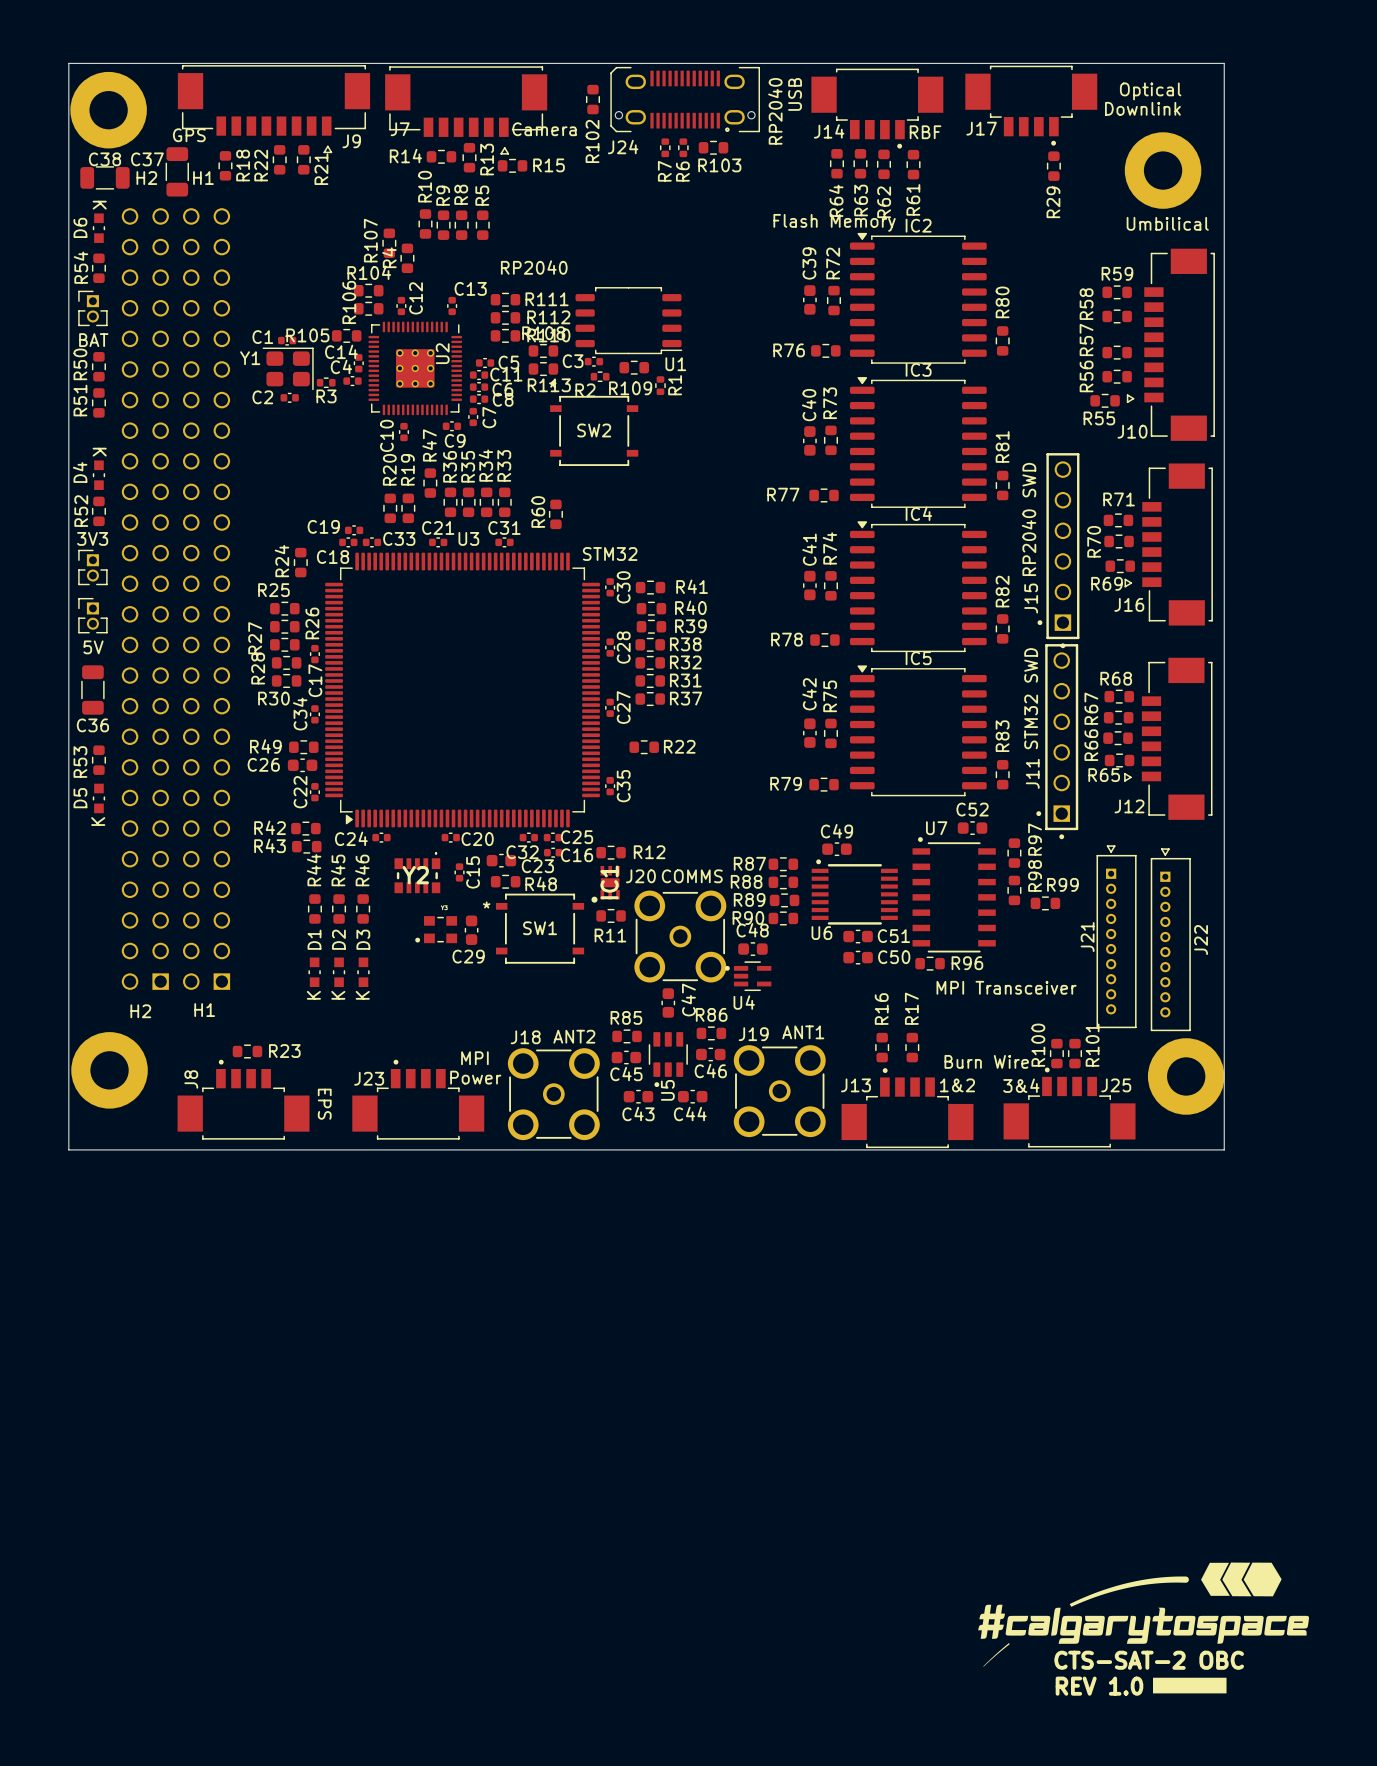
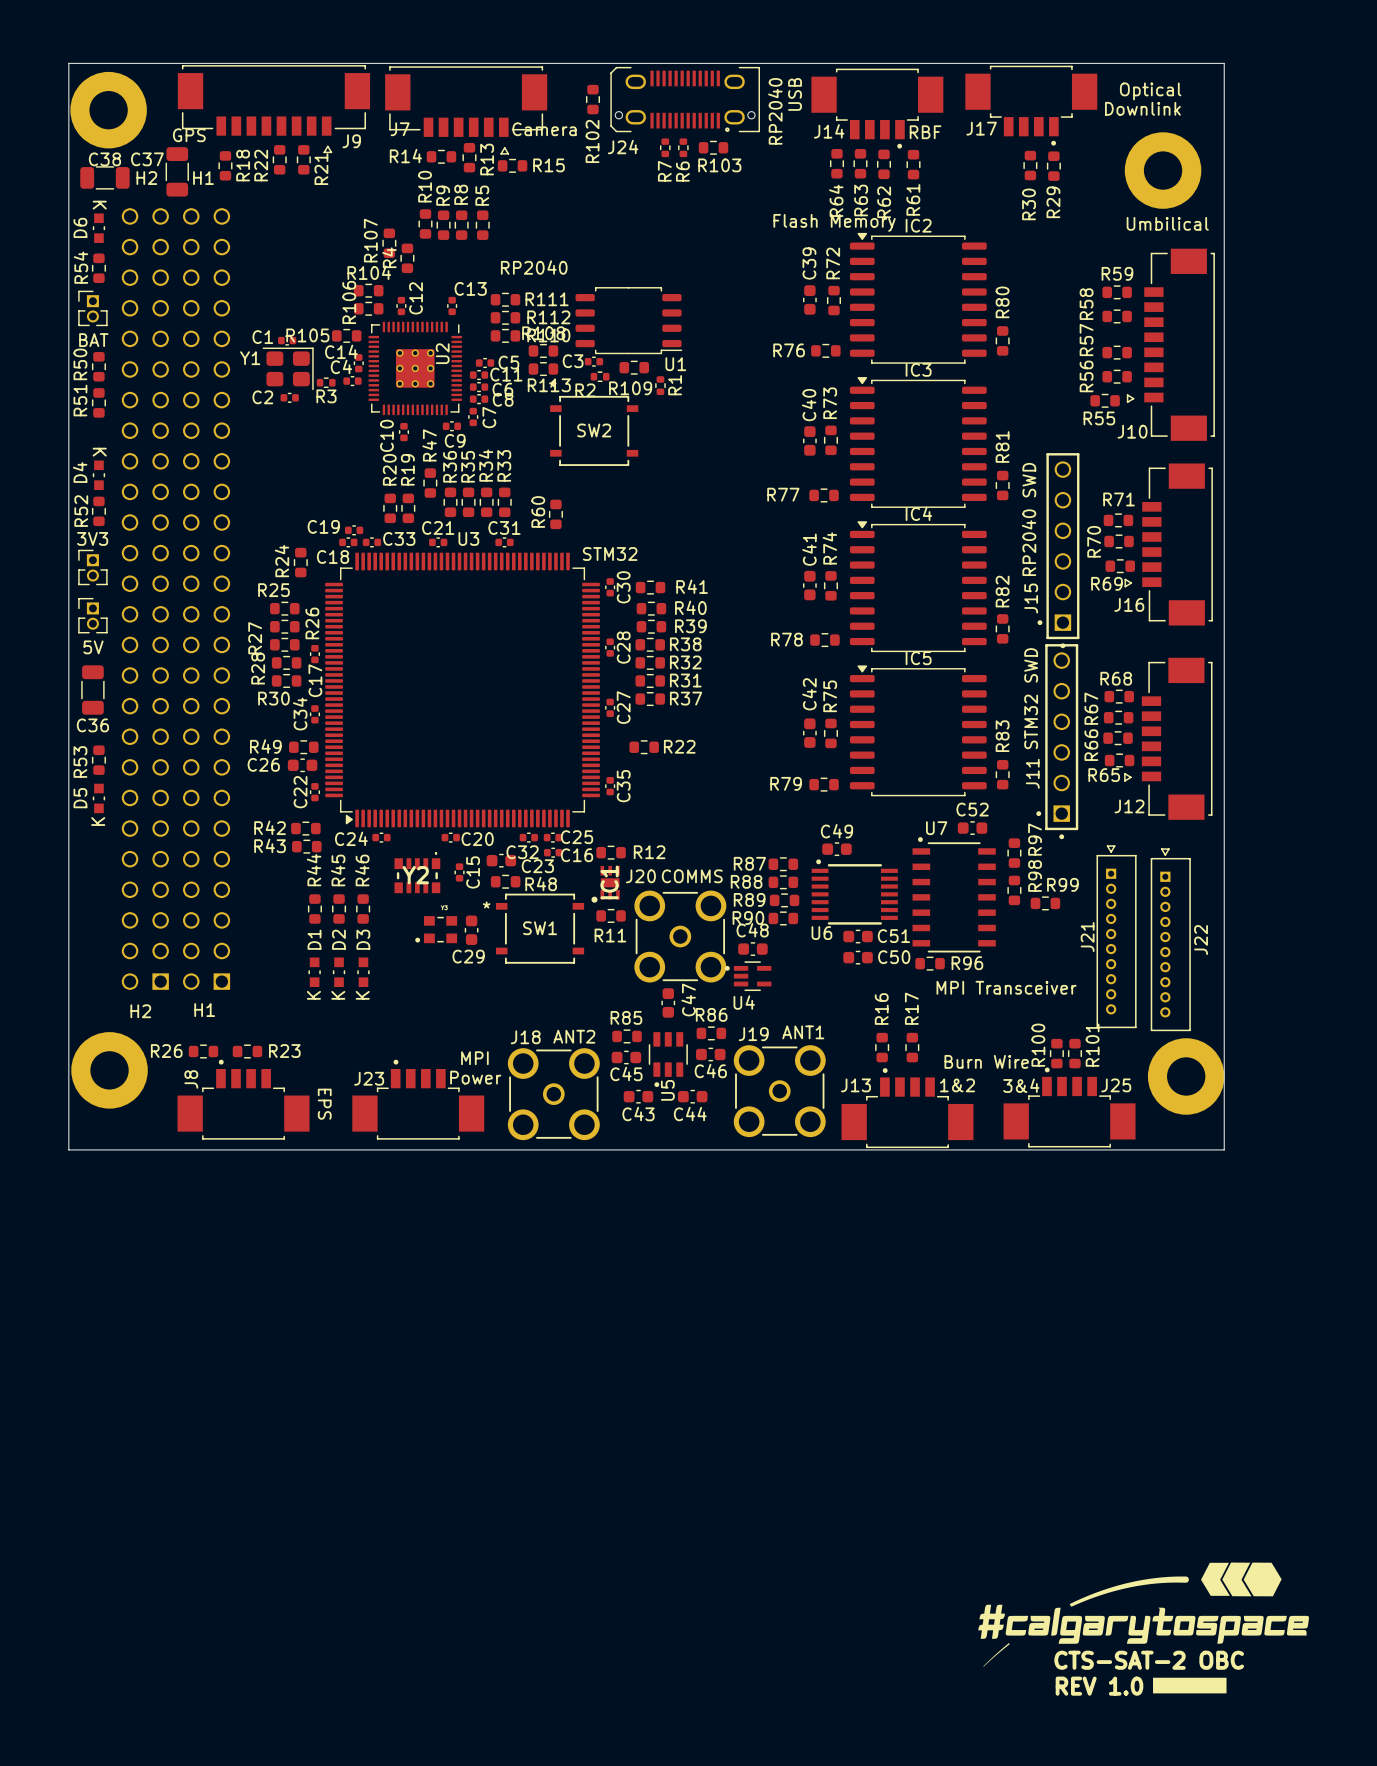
R30: none -> (1030, 165)
R26: none -> (203, 1051)

